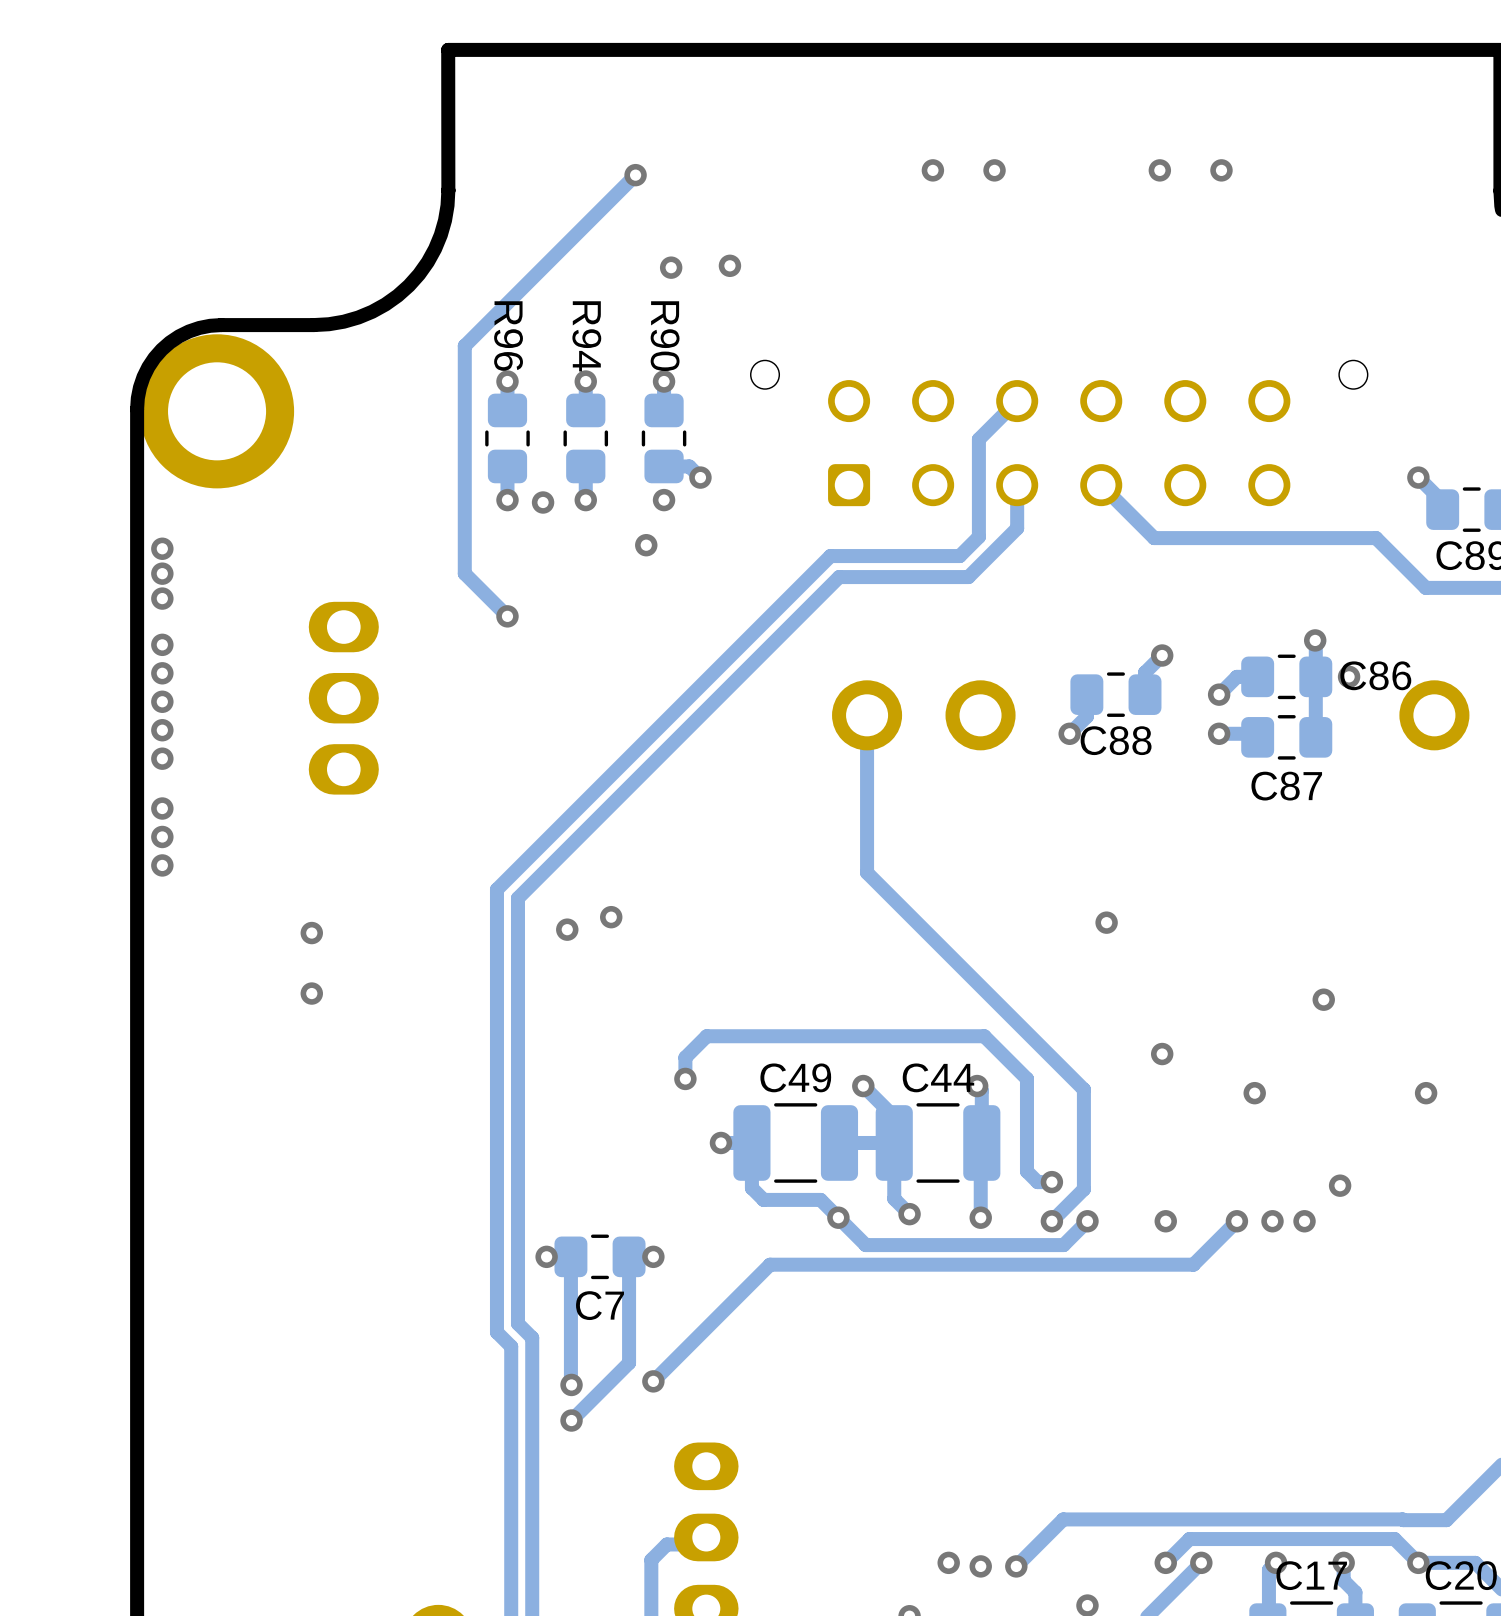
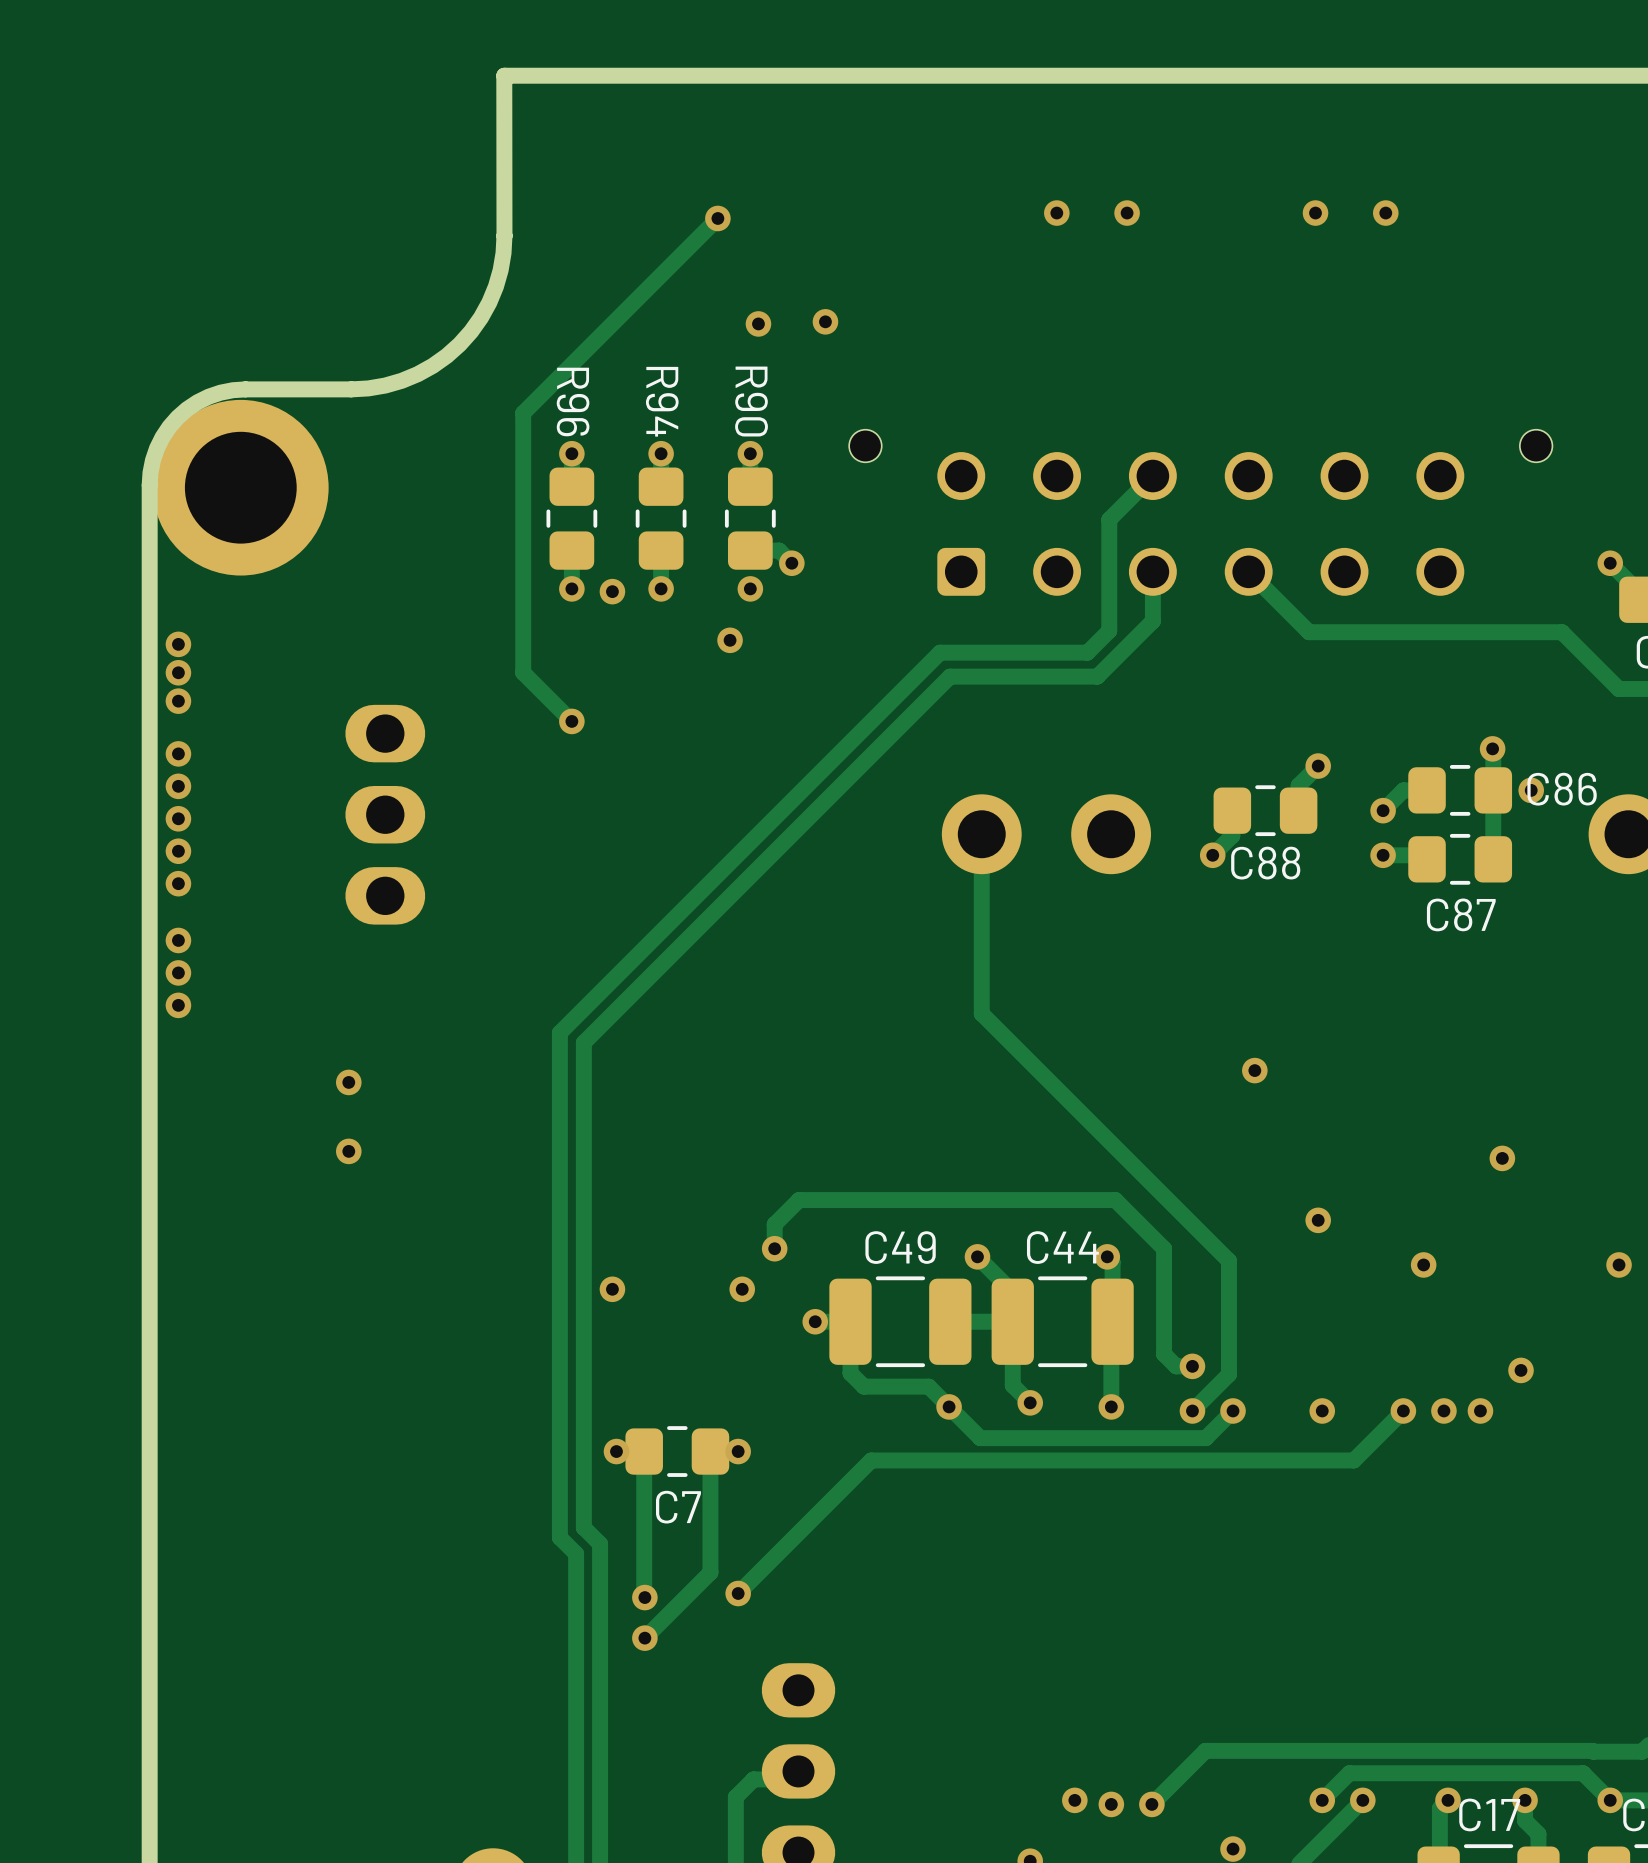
via: (611, 917) -> none
via: (567, 929) -> none
via: none -> (612, 1289)
via: none -> (742, 1289)

